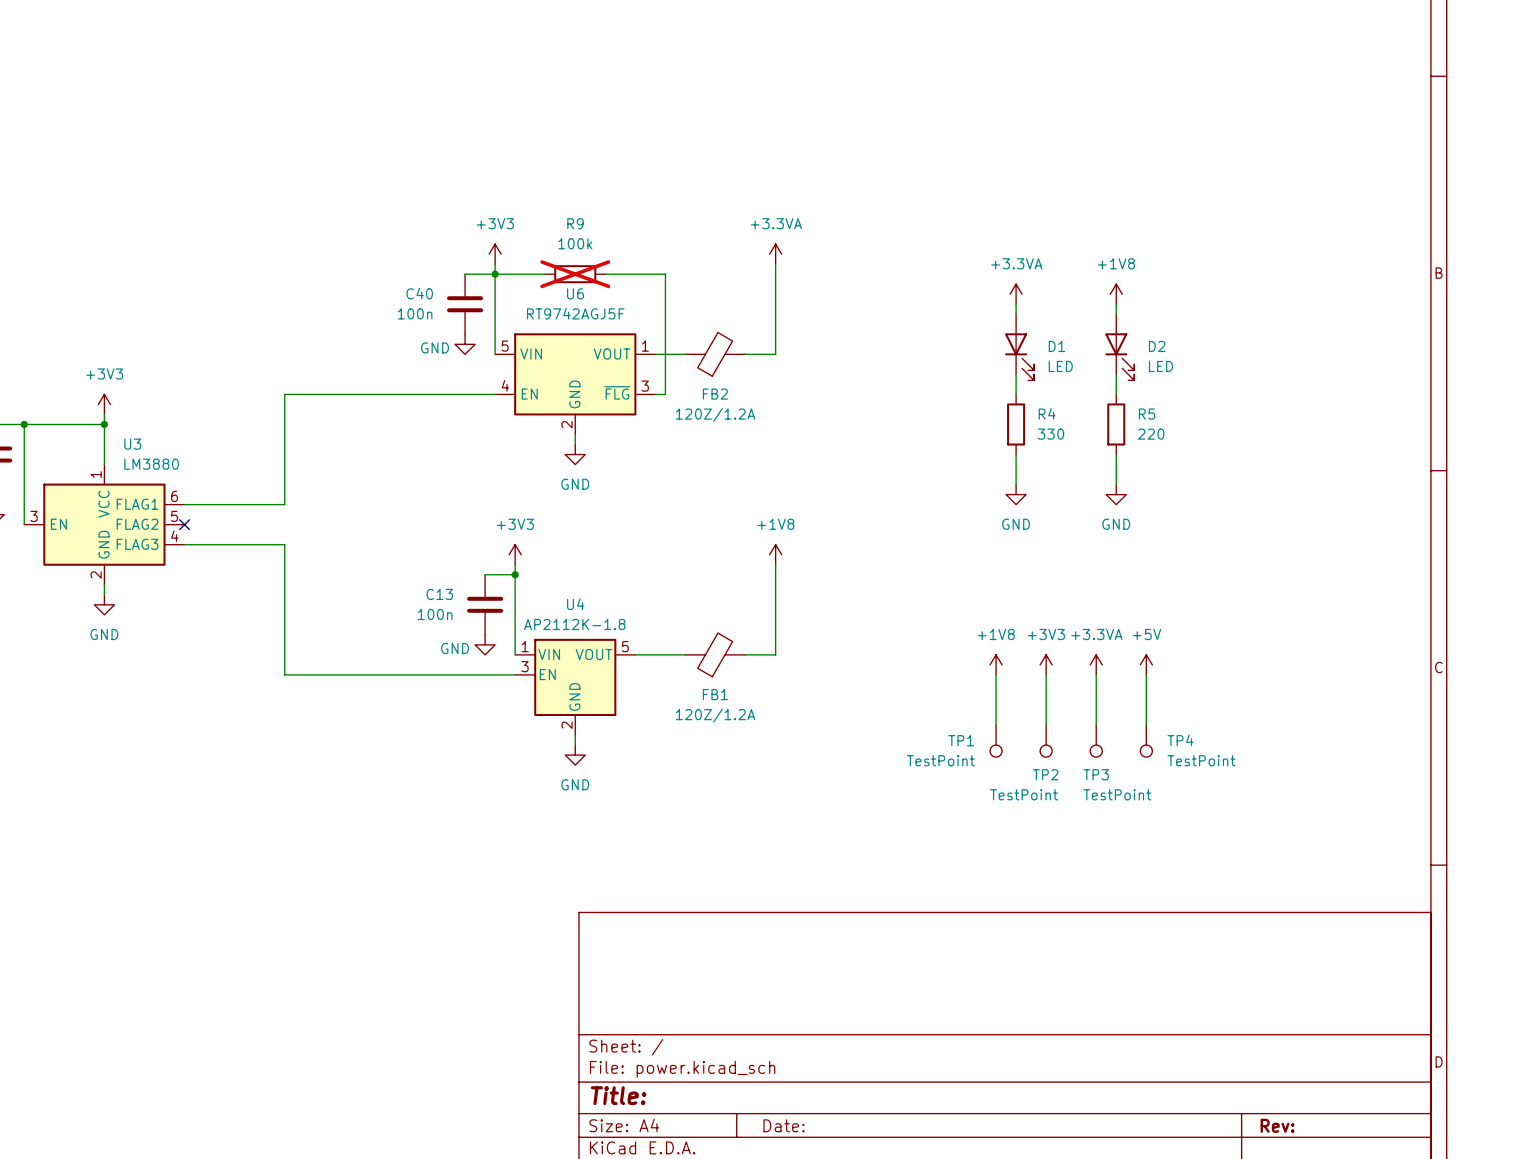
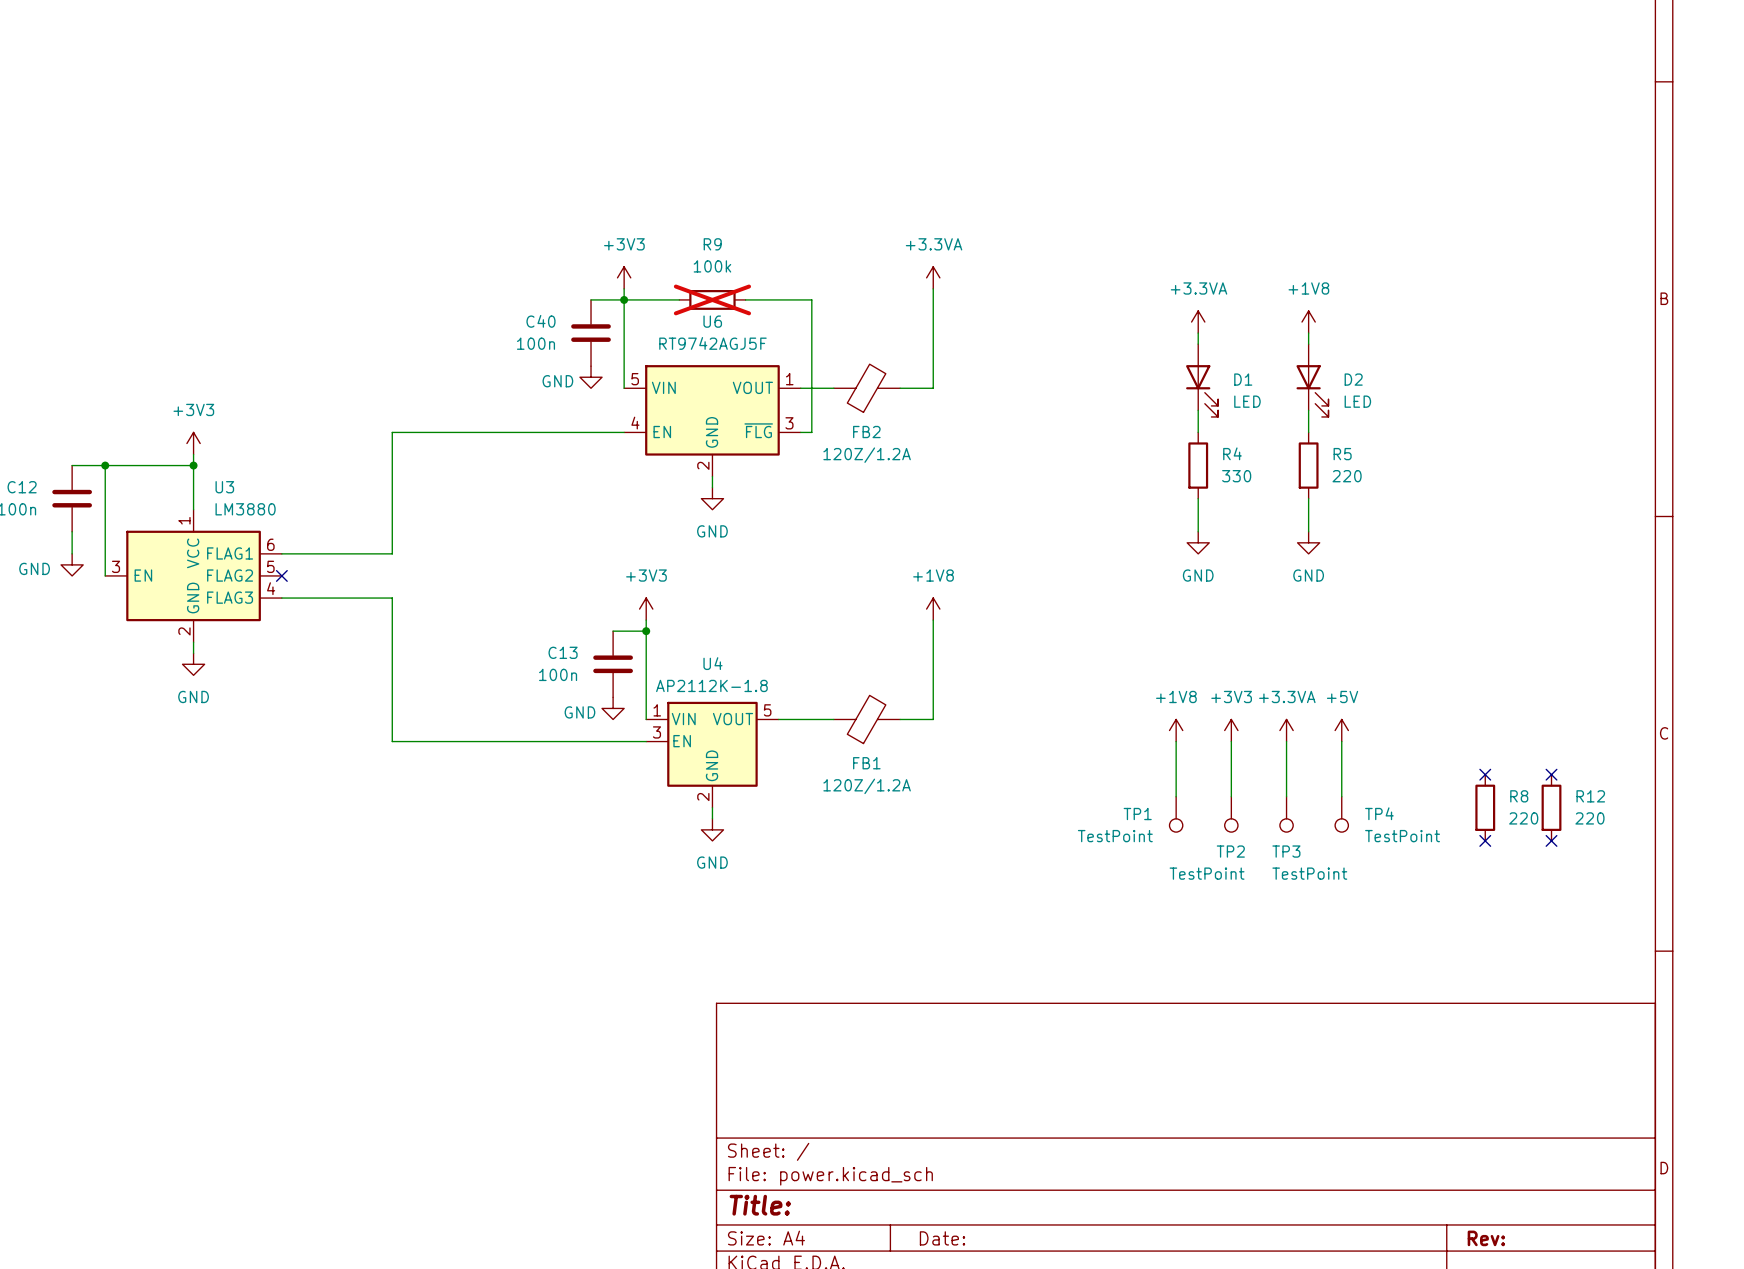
no-connect mark: none -> (1485, 774)
no-connect mark: none -> (1551, 774)
R8: none -> 220 (1485, 807)
R12: none -> 220 (1551, 807)
no-connect mark: none -> (1485, 840)
no-connect mark: none -> (1551, 840)

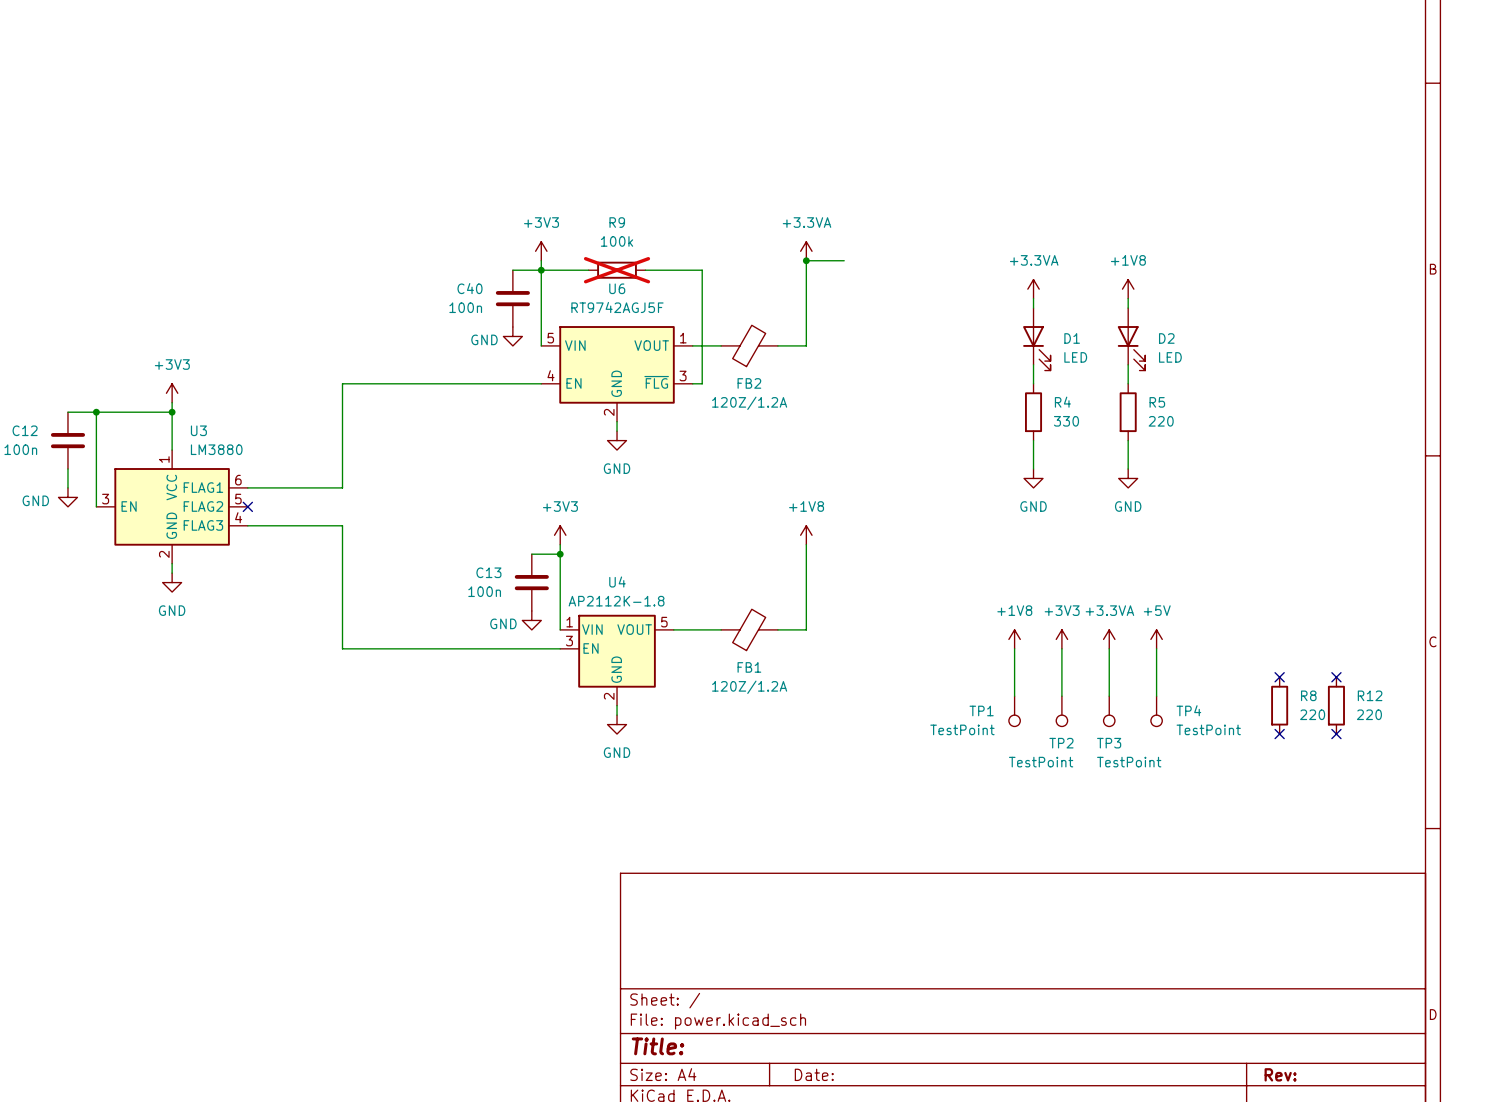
wire: none -> (806, 260) (844, 260)
junction: none -> (806, 260)

